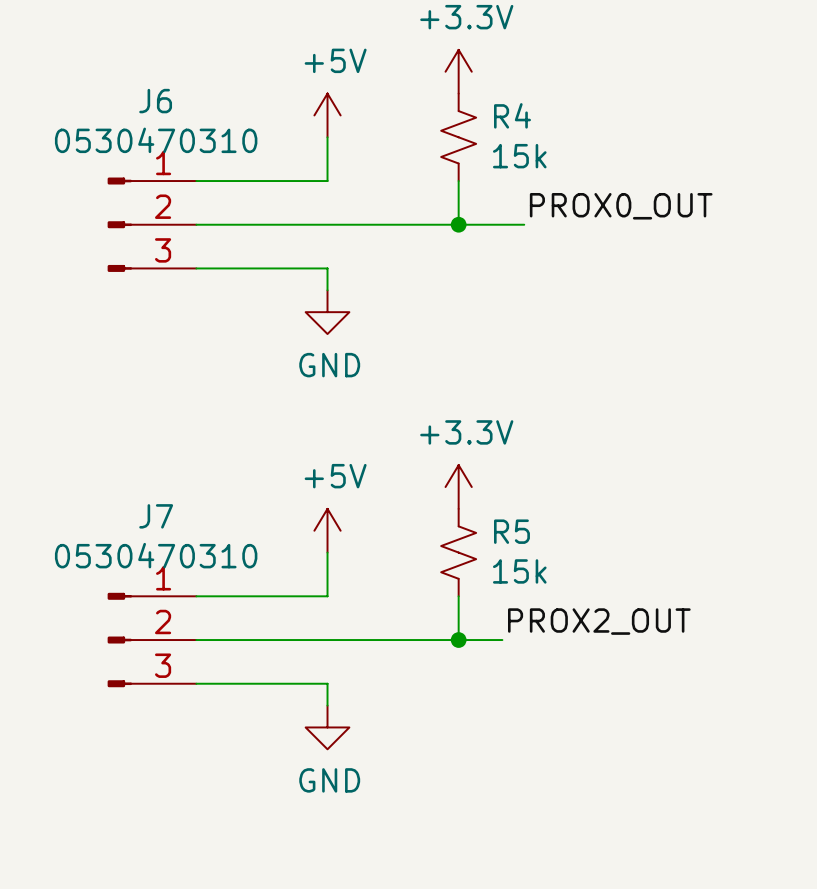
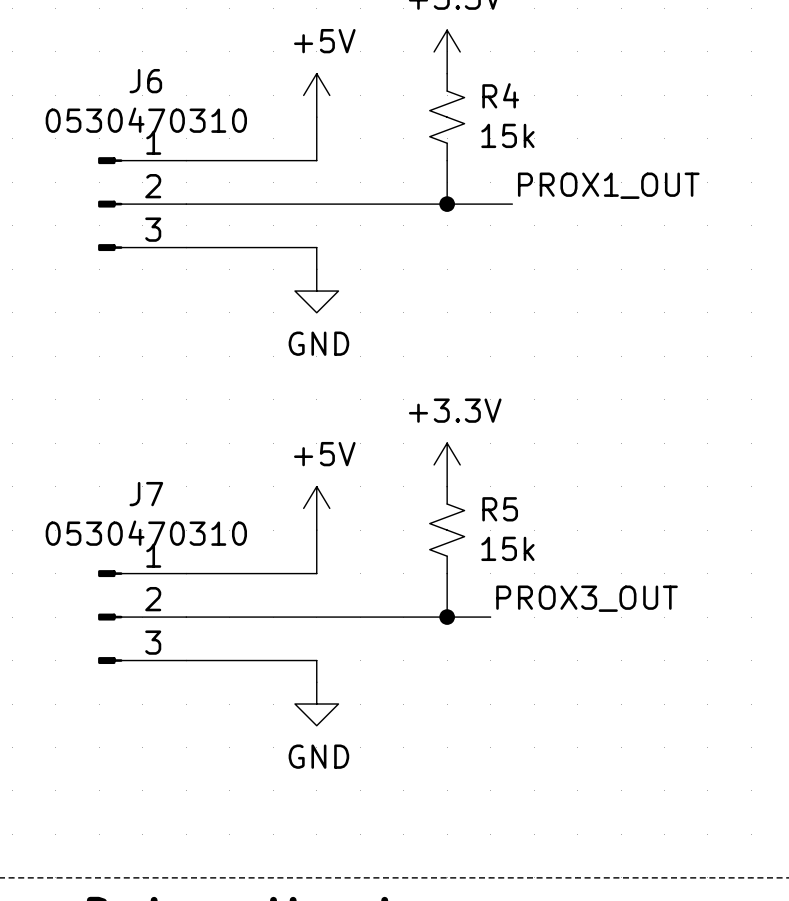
label: PROX0_OUT (621, 206) -> PROX1_OUT (608, 185)
label: PROX2_OUT (599, 621) -> PROX3_OUT (587, 598)

